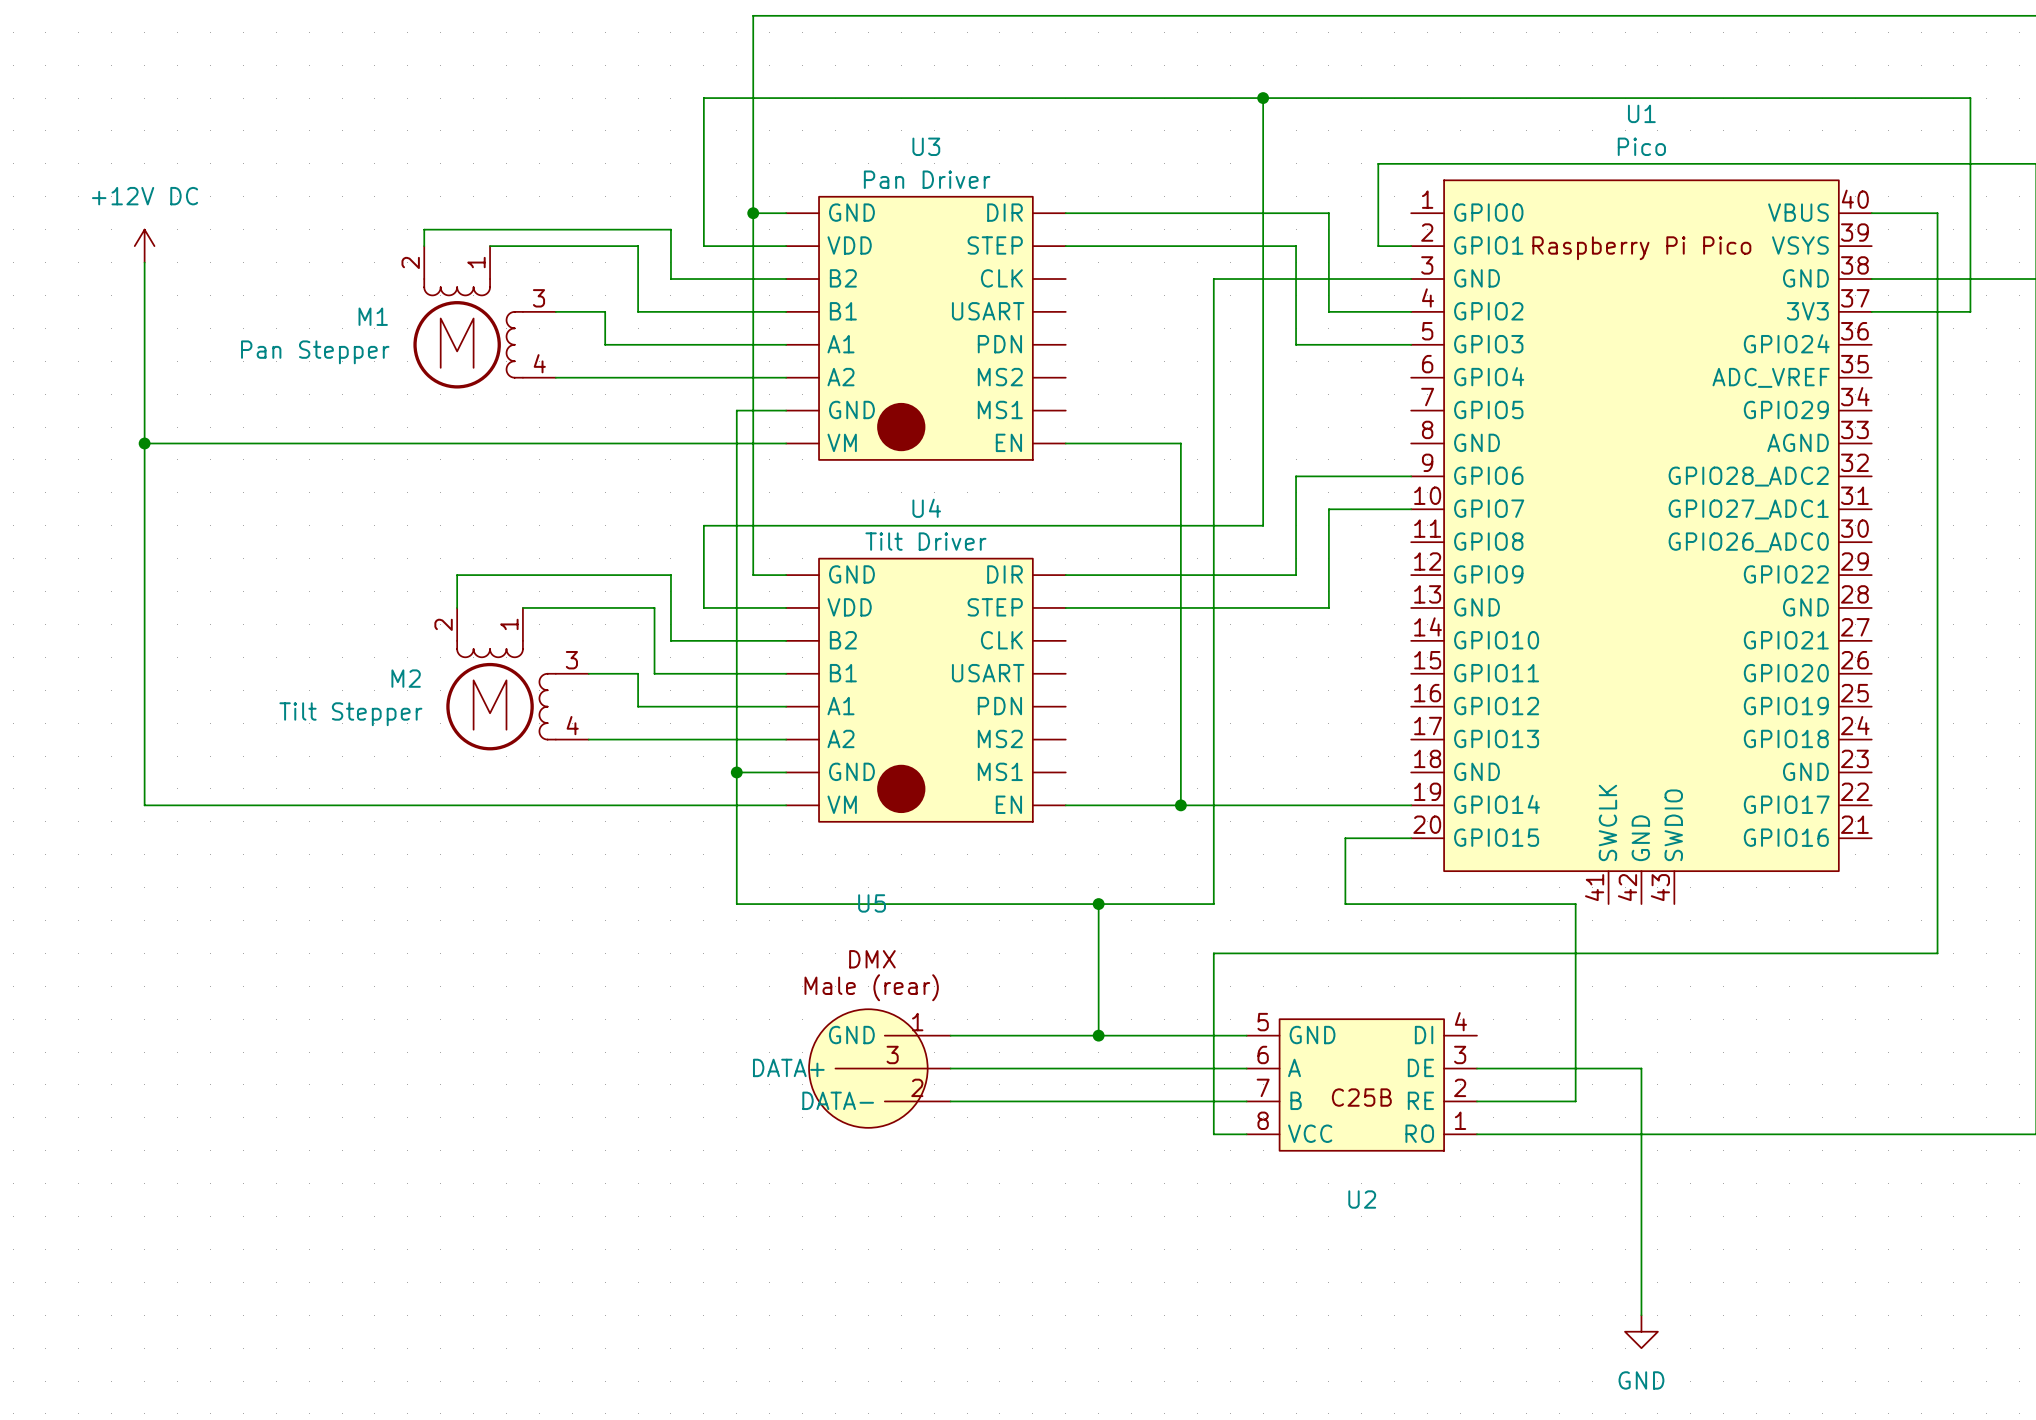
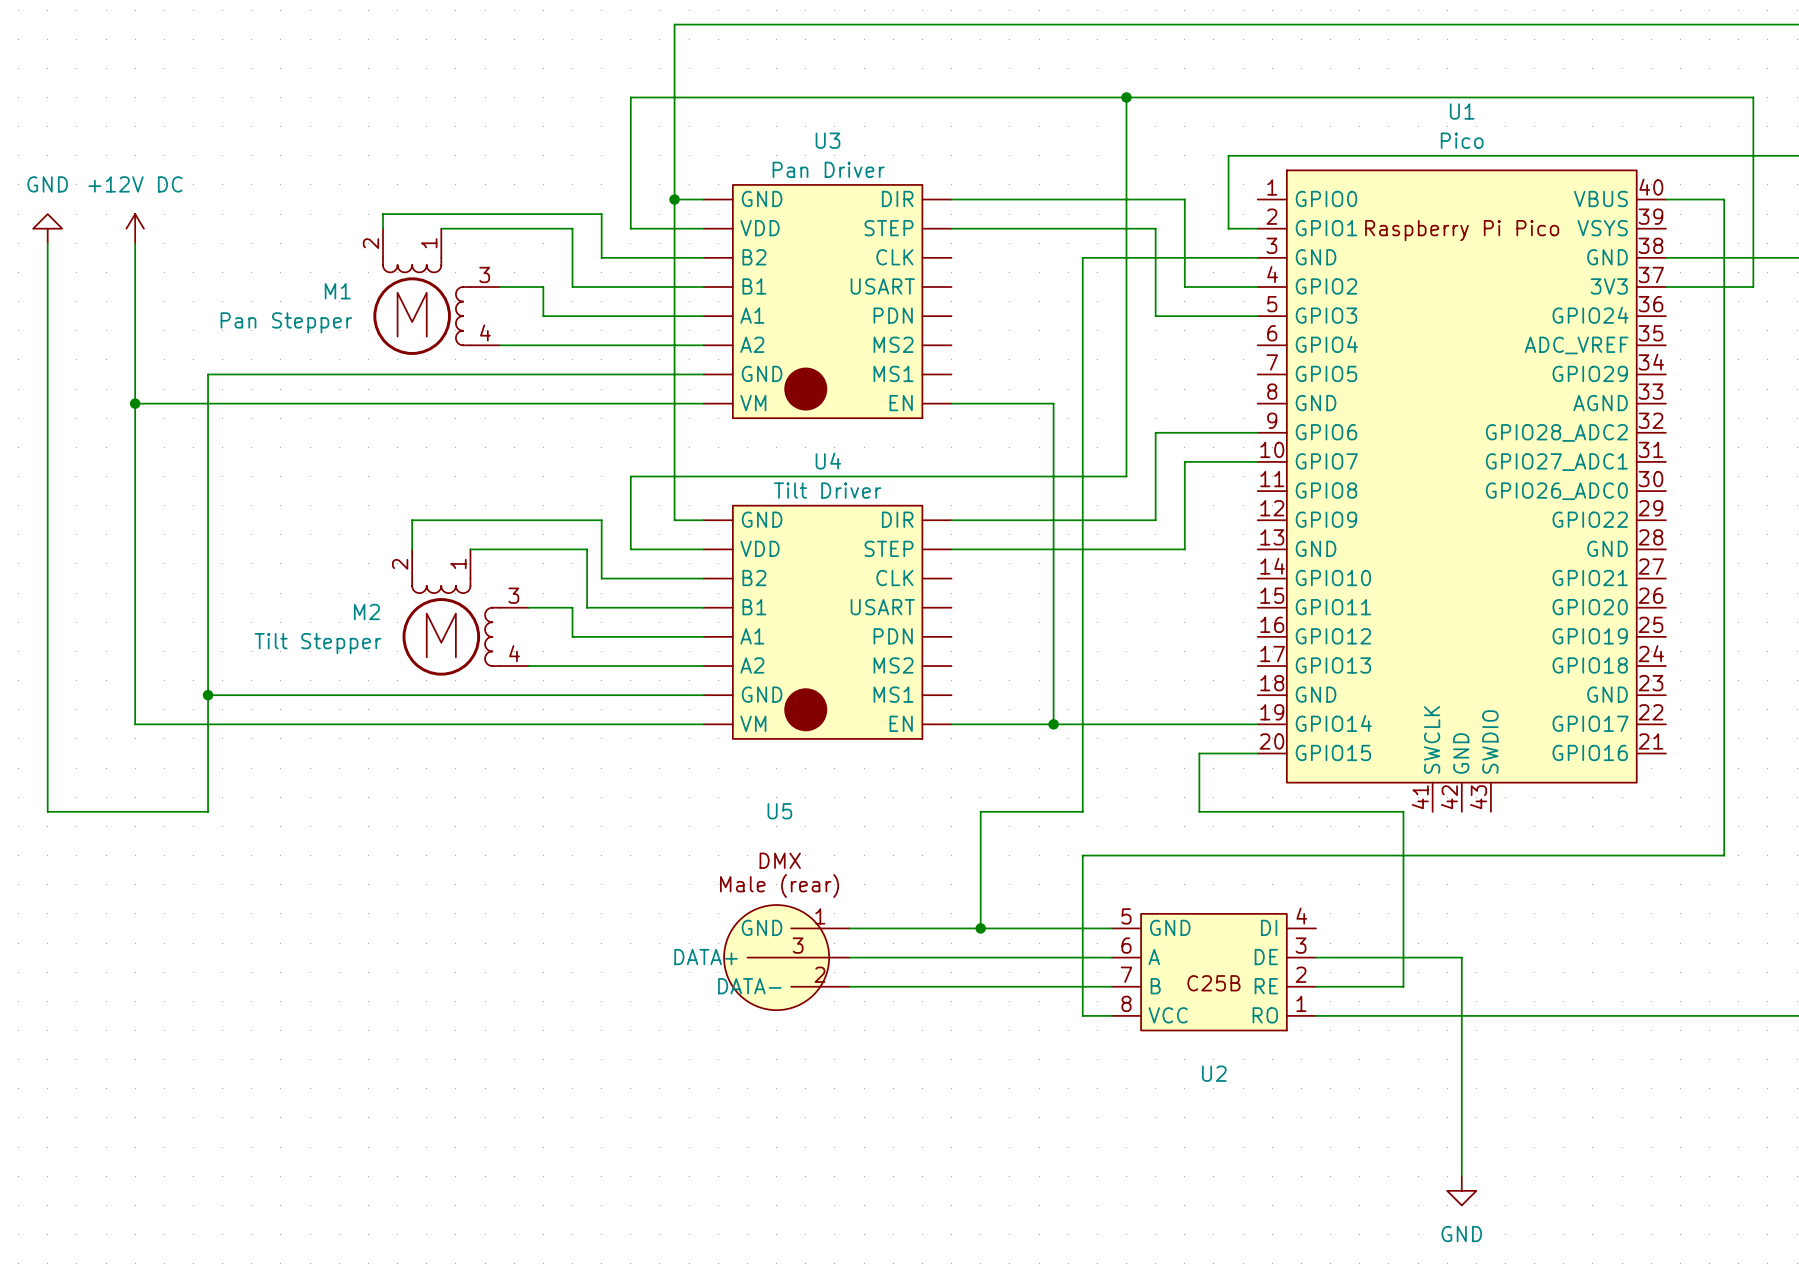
power symbol: none -> GND (47, 228)
wire: (736, 410) (736, 904) (1098, 904) -> (659, 374) (208, 374) (208, 811) (47, 811) (47, 243)
wire: none -> (208, 695) (659, 695)
junction: none -> (208, 695)
junction: (736, 772) -> none
junction: (1098, 904) -> none

